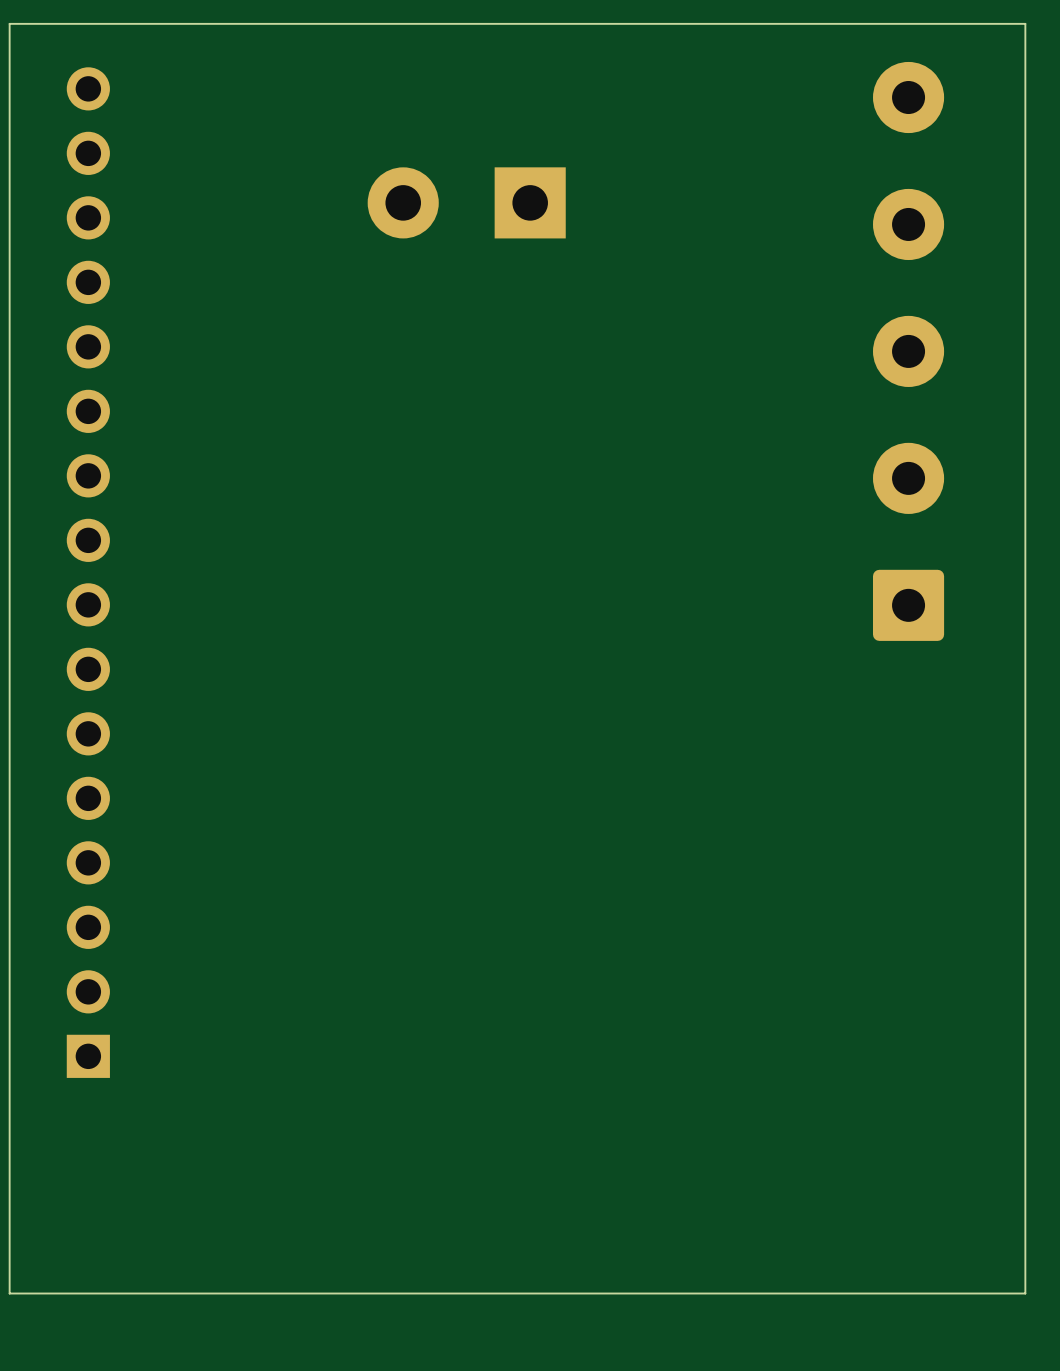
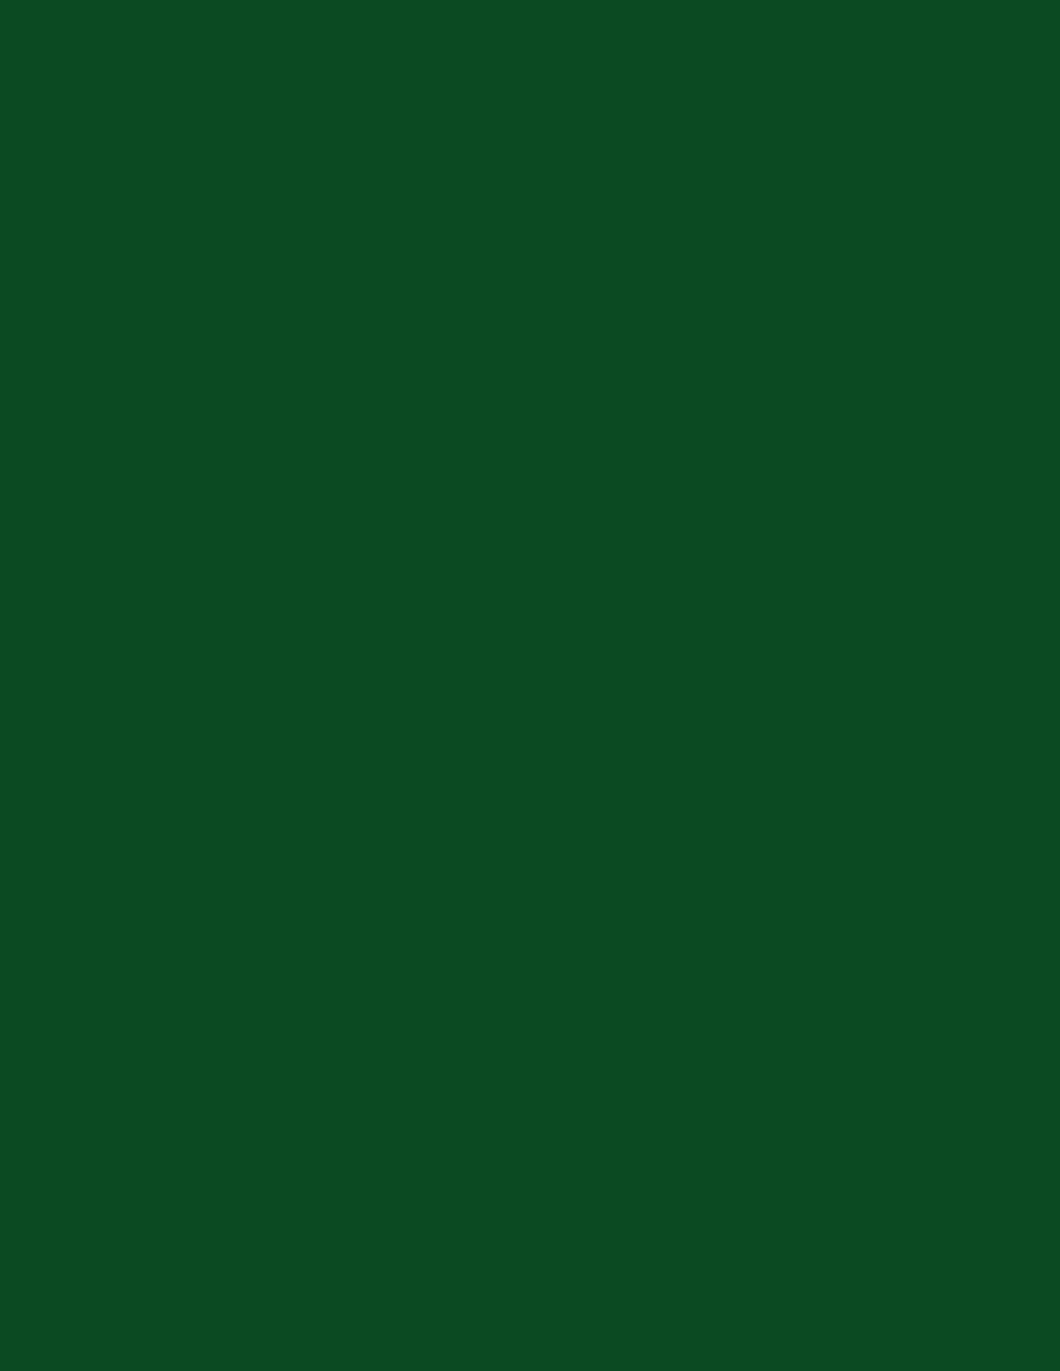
board edge: (1025, 23) (9, 23) (9, 1293) (1025, 1293) (1025, 23) -> none
part: (466, 202) -> none
part: (908, 351) -> none
part: (88, 572) -> none

